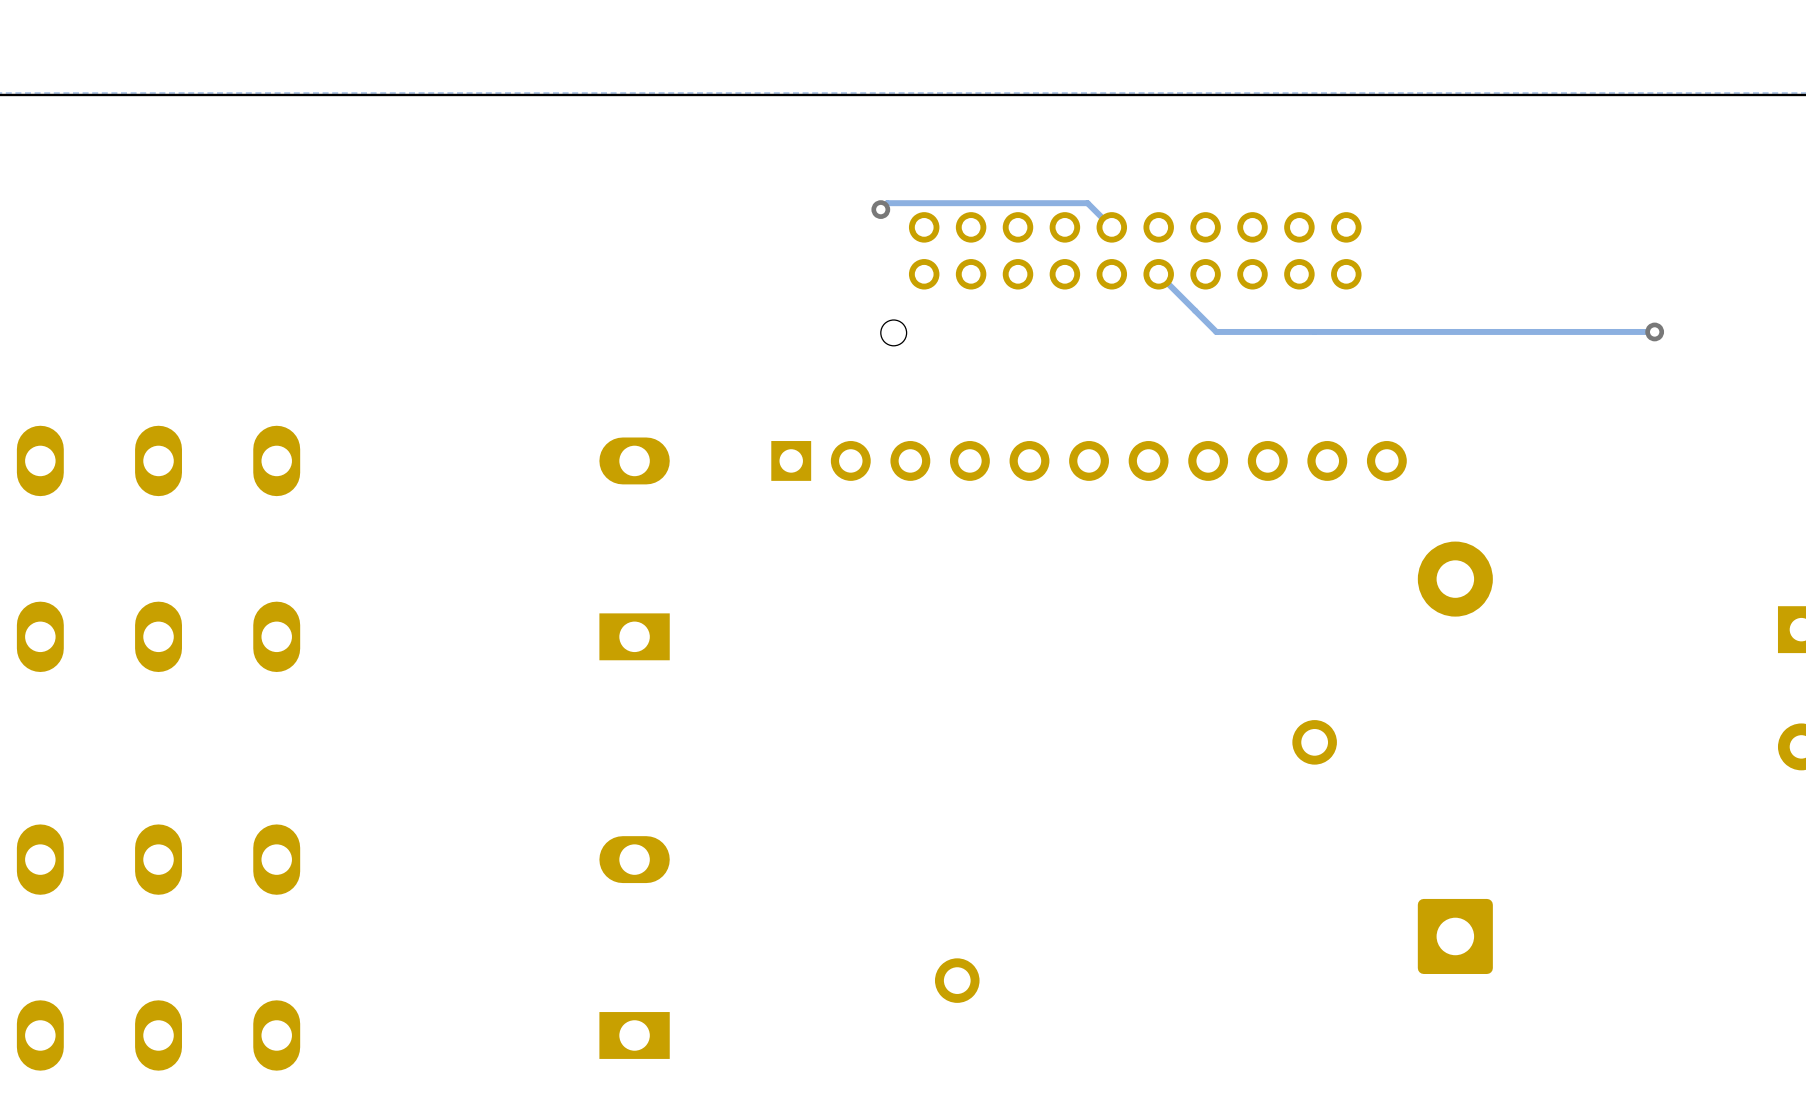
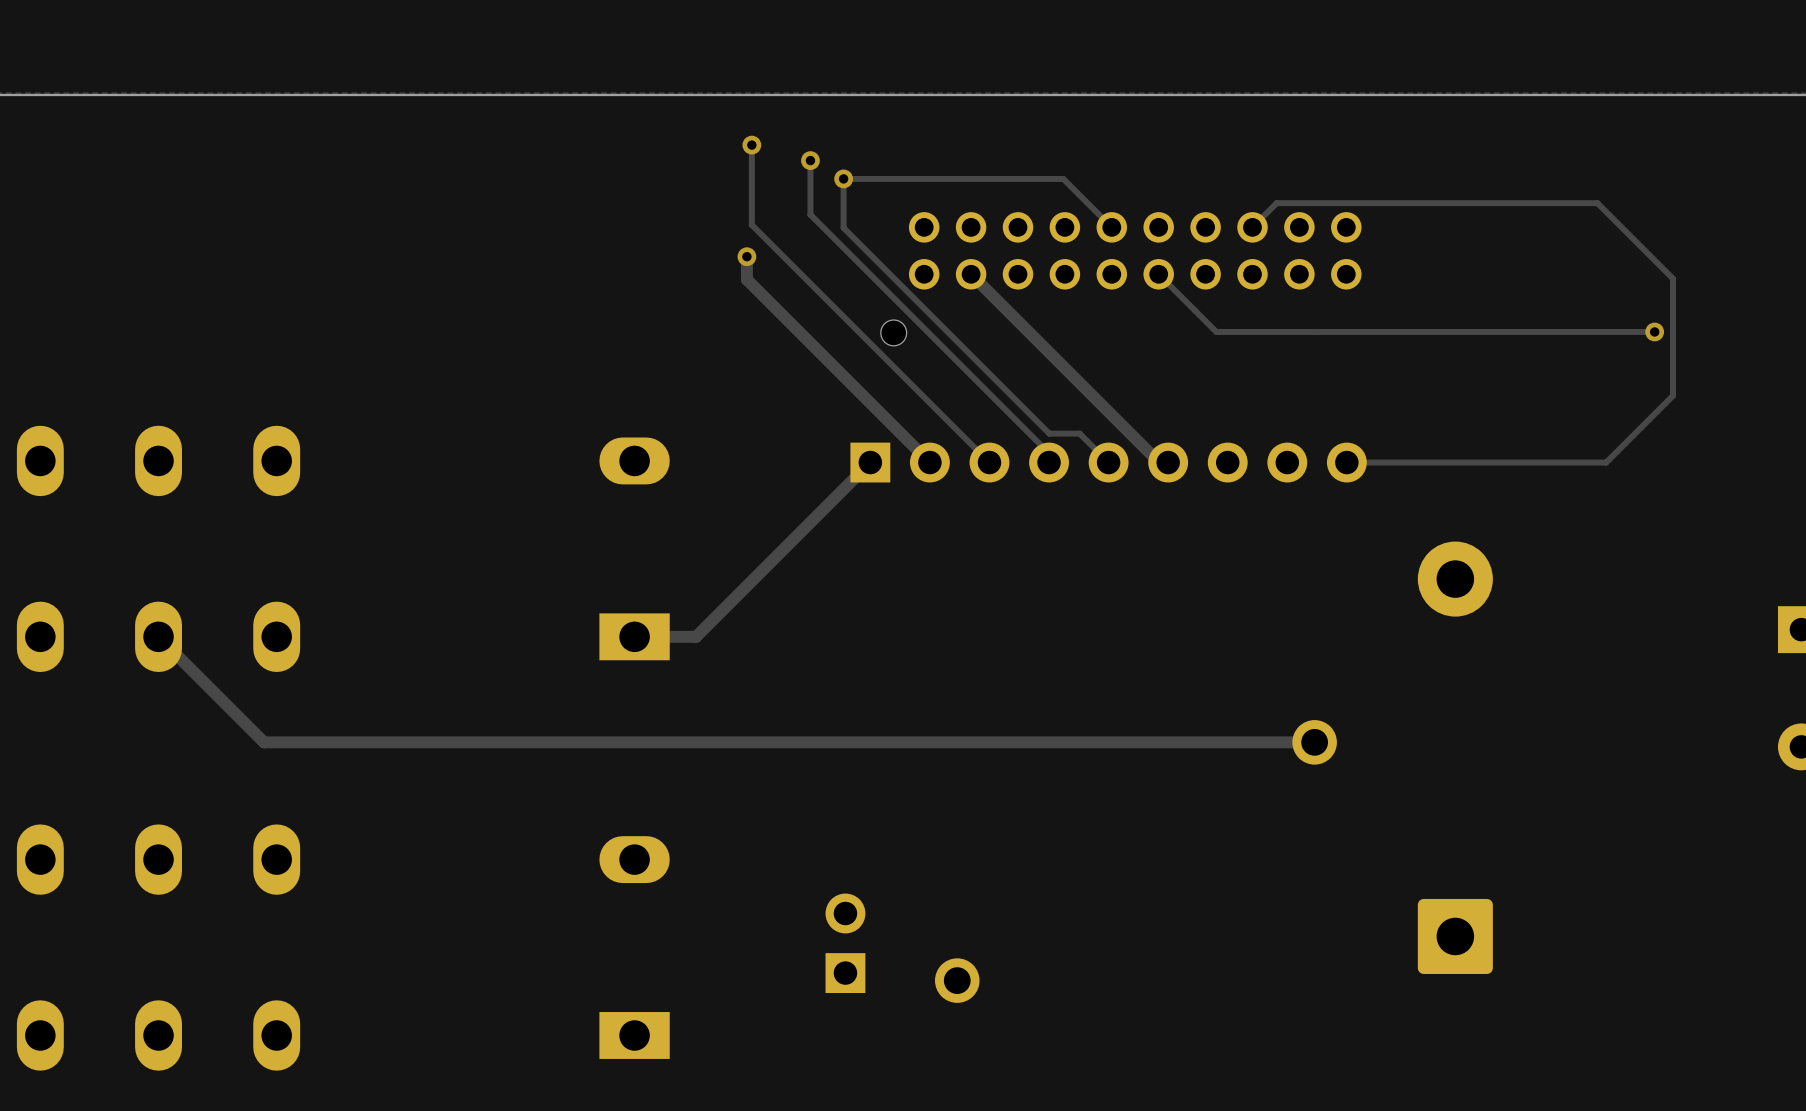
track: none -> (751, 145) (751, 224) (989, 462)
via: none -> (751, 145)
track: none -> (810, 160) (810, 214) (1049, 453) (1049, 462)
via: none -> (810, 160)
track: none -> (843, 178) (843, 227) (1049, 433) (1079, 433) (1108, 462)
via: none -> (843, 178)
track: (1087, 203) (887, 203) (880, 209) -> (1087, 203) (1063, 178) (843, 178)
via: (880, 209) -> none
track: none -> (1252, 227) (1276, 203) (1597, 203) (1673, 278) (1673, 395) (1606, 462) (1346, 462)
track: none -> (746, 256) (746, 279) (929, 462)
via: none -> (746, 256)
track: none -> (971, 274) (1159, 462) (1168, 462)
part footprint: [771, 441, 1407, 481] -> [850, 442, 1367, 483]
track: none -> (870, 462) (696, 636) (634, 636)
track: none -> (158, 636) (264, 742) (1314, 742)
part: none -> (845, 943)

